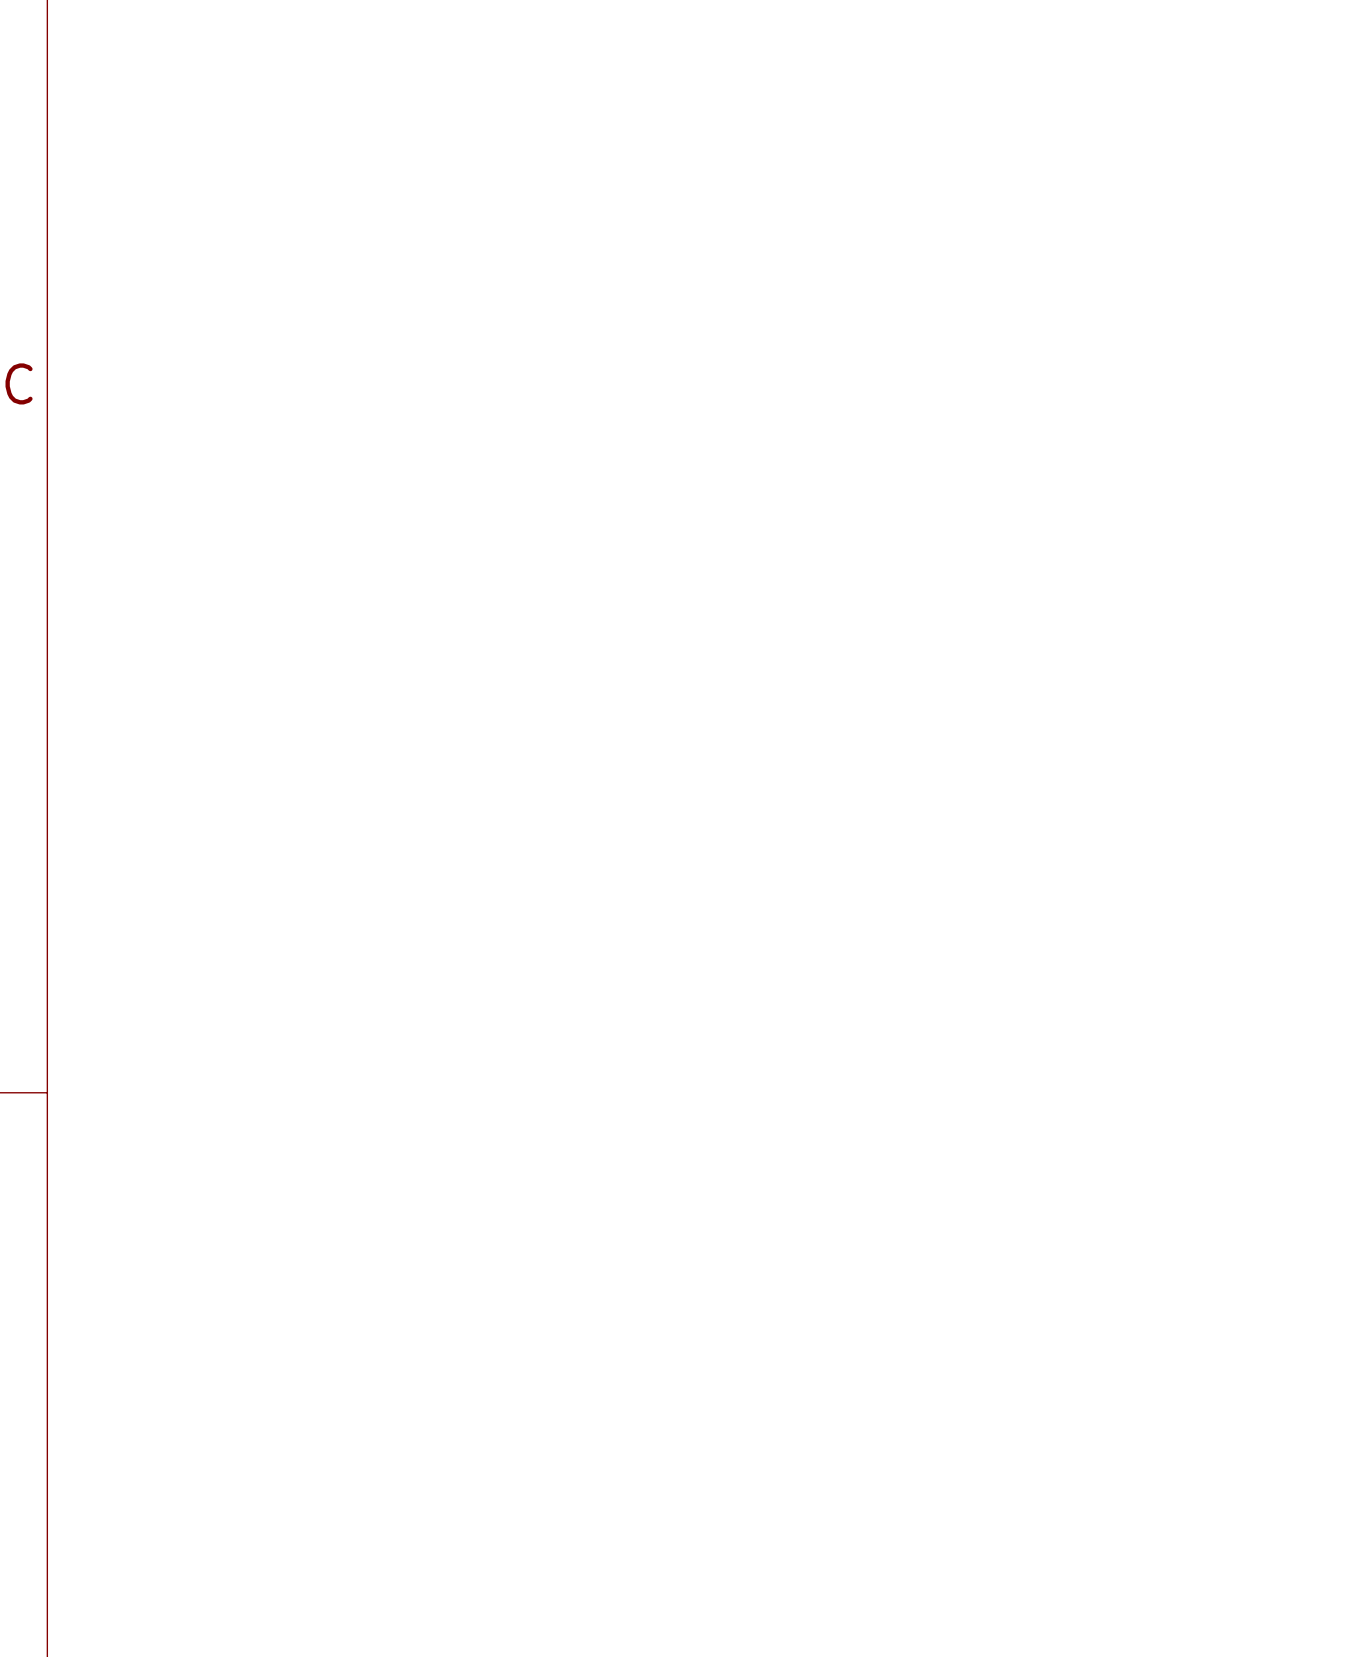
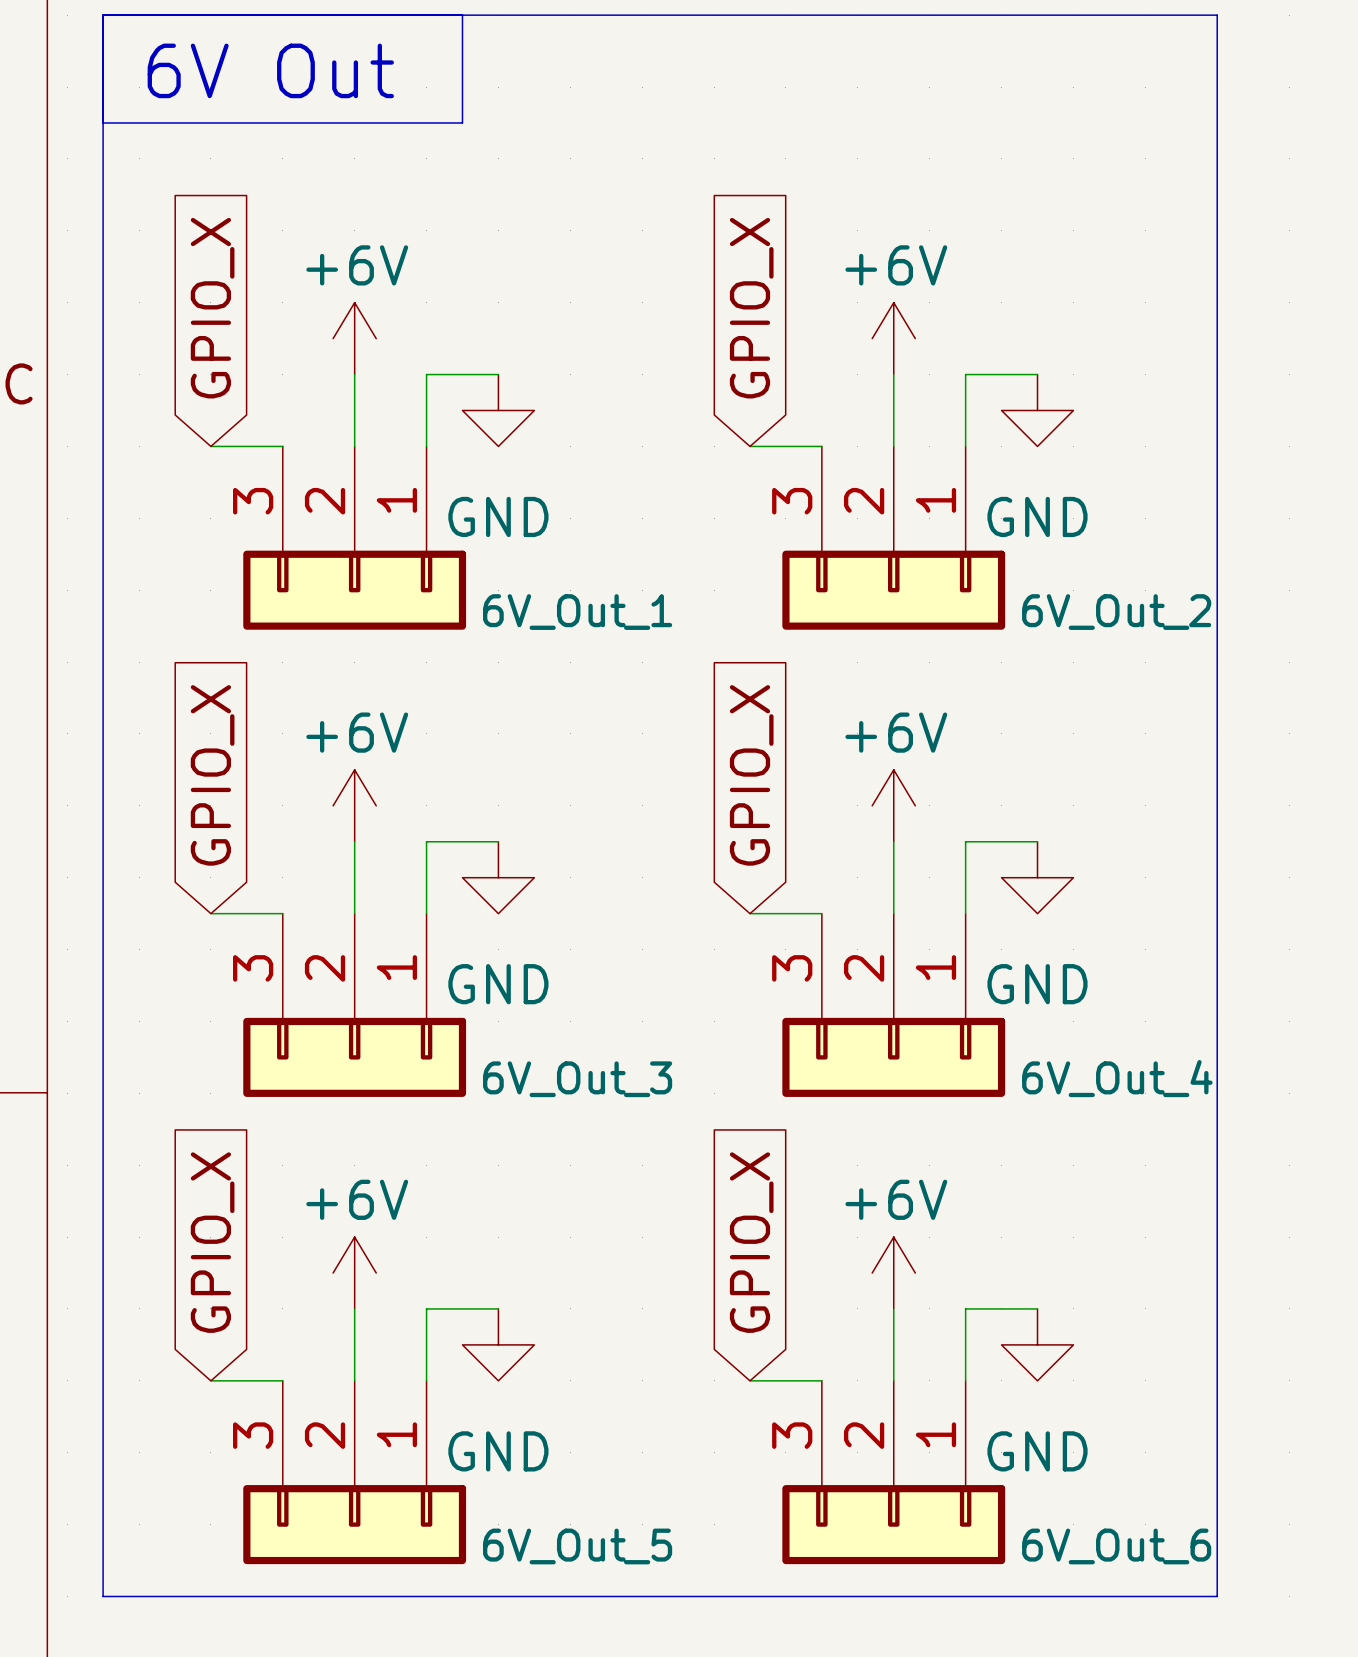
line: none -> (103, 15) (1217, 15) (1217, 1596) (103, 1596) (103, 15)
line: none -> (462, 15) (462, 122) (103, 122)
text: none -> 6V Out (270, 70)
global label: none -> GPIO_X (212, 308)
global label: none -> GPIO_X (751, 308)
power symbol: none -> +6V (354, 338)
power symbol: none -> +6V (893, 338)
wire: none -> (354, 374) (354, 446)
wire: none -> (498, 374) (426, 374) (426, 446)
wire: none -> (893, 374) (893, 446)
wire: none -> (1037, 374) (965, 374) (965, 446)
power symbol: none -> GND (498, 410)
power symbol: none -> GND (1037, 410)
wire: none -> (210, 446) (282, 446)
wire: none -> (749, 446) (821, 446)
part: none -> 6V_Out_1 (354, 538)
part: none -> 6V_Out_2 (893, 538)
global label: none -> GPIO_X (212, 775)
global label: none -> GPIO_X (751, 775)
power symbol: none -> +6V (354, 805)
power symbol: none -> +6V (893, 805)
wire: none -> (354, 841) (354, 913)
wire: none -> (498, 841) (426, 841) (426, 913)
wire: none -> (893, 841) (893, 913)
wire: none -> (1037, 841) (965, 841) (965, 913)
power symbol: none -> GND (498, 877)
power symbol: none -> GND (1037, 877)
wire: none -> (210, 913) (282, 913)
wire: none -> (749, 913) (821, 913)
part: none -> 6V_Out_3 (354, 1005)
part: none -> 6V_Out_4 (893, 1005)
global label: none -> GPIO_X (212, 1242)
global label: none -> GPIO_X (751, 1242)
power symbol: none -> +6V (354, 1273)
power symbol: none -> +6V (893, 1273)
wire: none -> (354, 1308) (354, 1380)
wire: none -> (498, 1308) (426, 1308) (426, 1380)
wire: none -> (893, 1308) (893, 1380)
wire: none -> (1037, 1308) (965, 1308) (965, 1380)
power symbol: none -> GND (498, 1344)
power symbol: none -> GND (1037, 1344)
wire: none -> (210, 1380) (282, 1380)
wire: none -> (749, 1380) (821, 1380)
part: none -> 6V_Out_5 (354, 1472)
part: none -> 6V_Out_6 (893, 1472)

